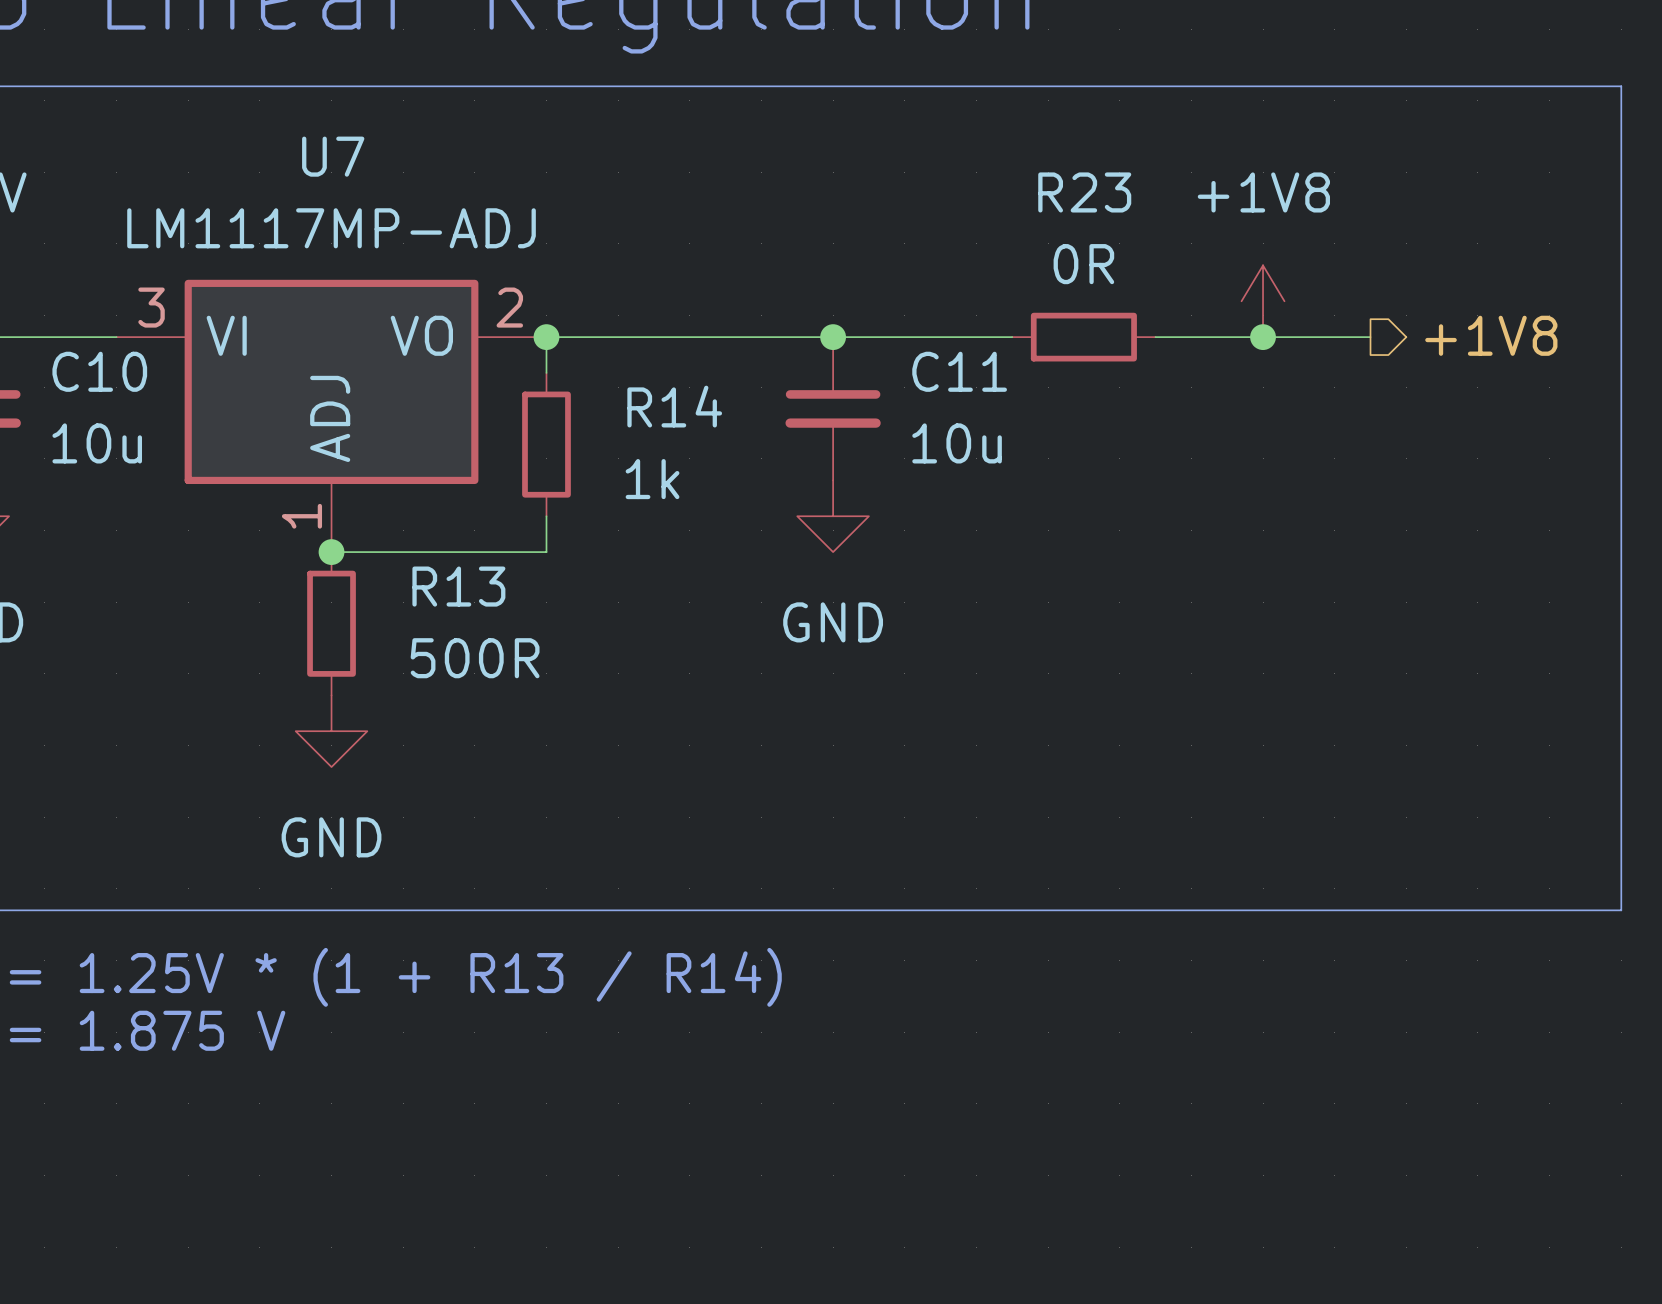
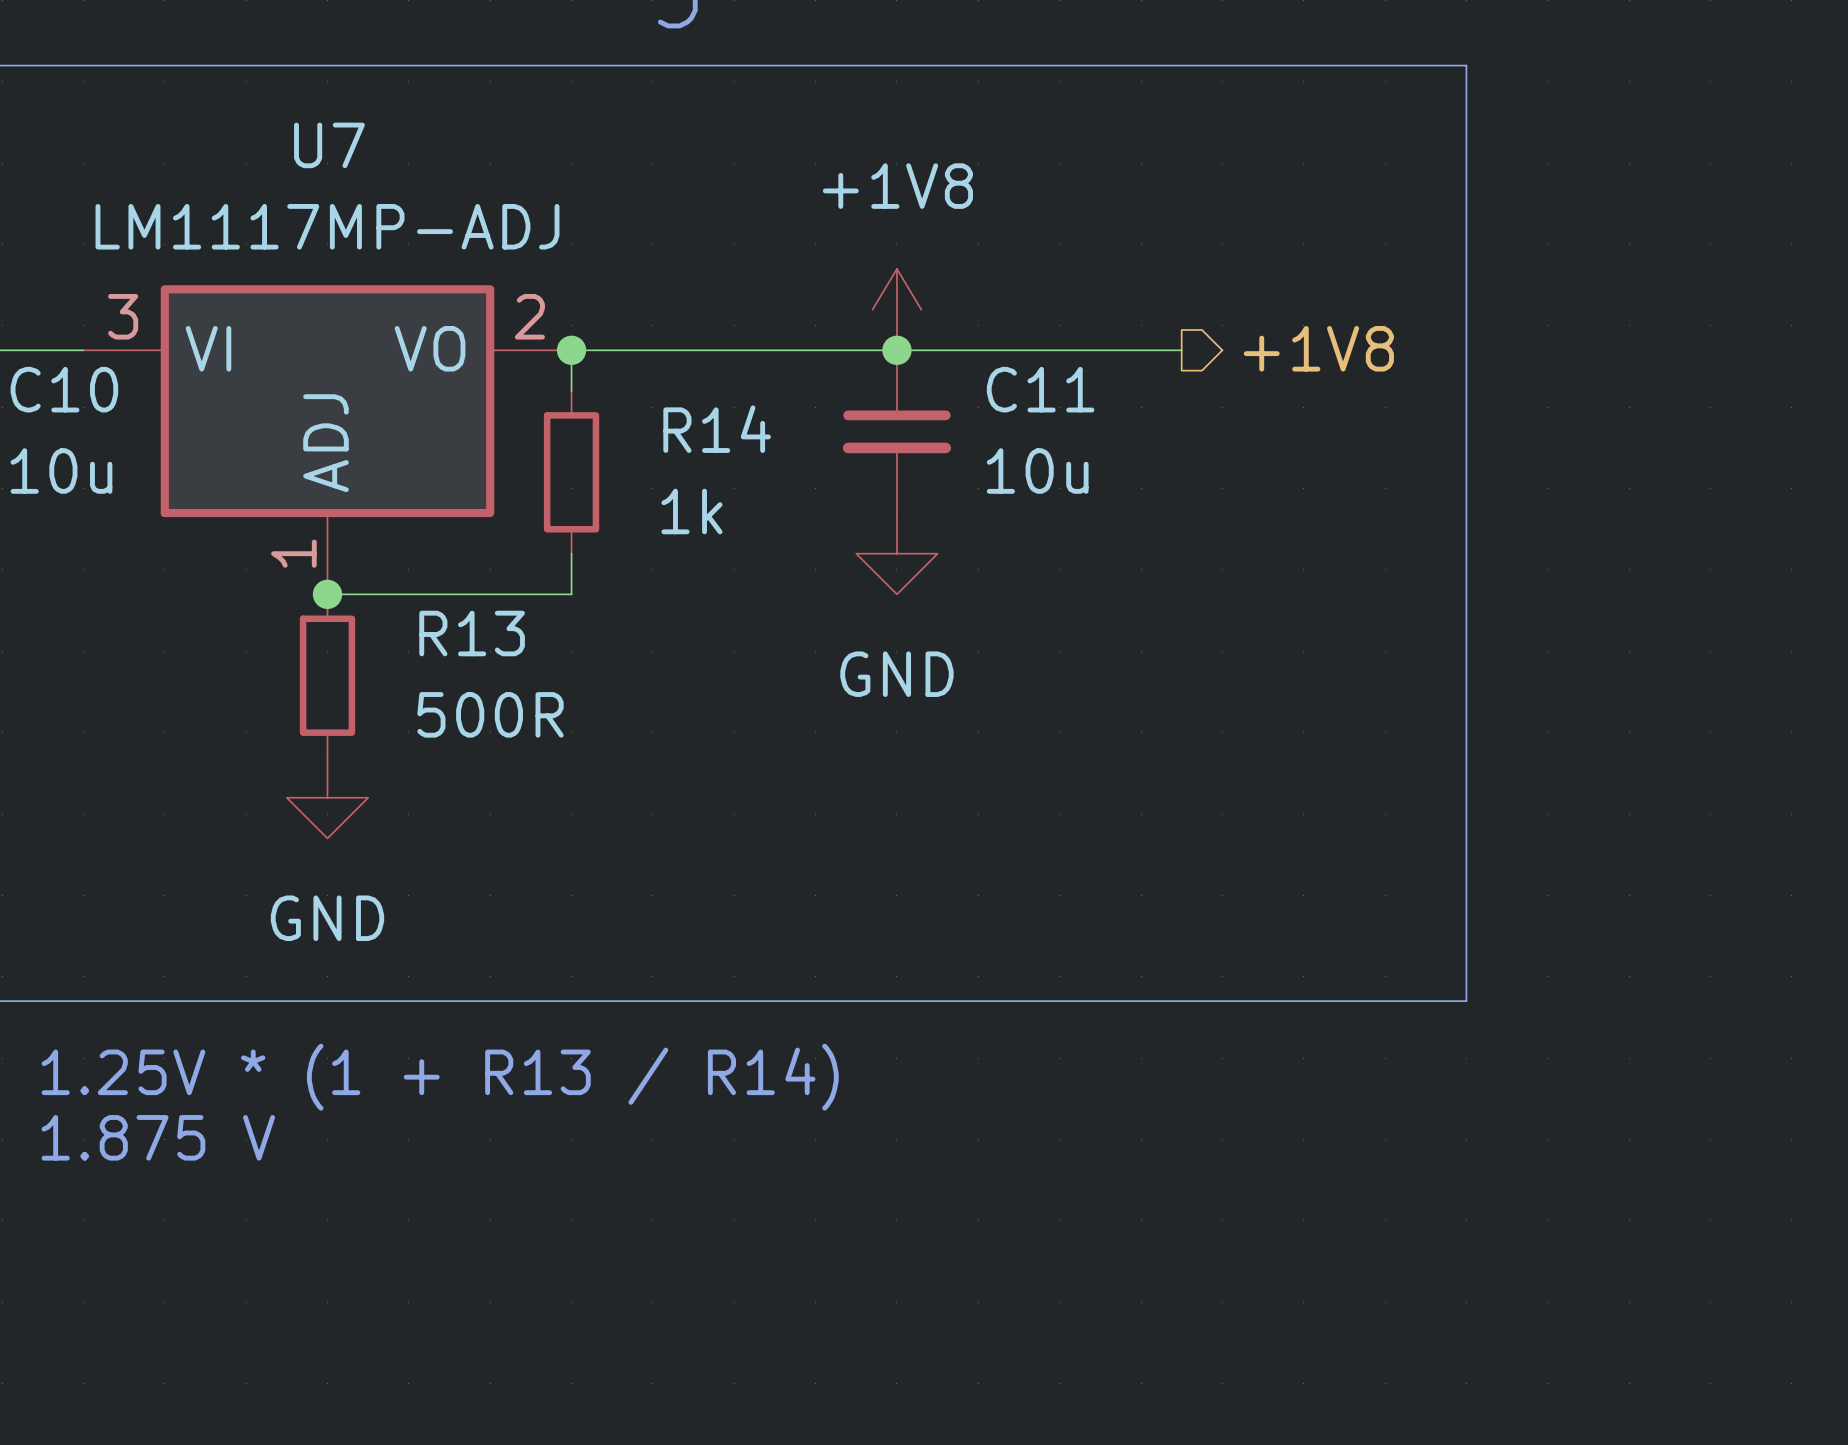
line: (1334, 86) (1621, 86) (1621, 910) (1334, 910) -> (1466, 65) (1466, 1001)
power symbol position: +1V8 (1263, 301) -> +1V8 (896, 309)
hierarchical label position: +1V8 (1491, 335) -> +1V8 (1318, 348)
wire: none -> (1100, 350) (1181, 350)
R23: 0R (1083, 337) -> none
wire: (1155, 337) (1370, 337) -> none
junction: (1263, 337) -> none

